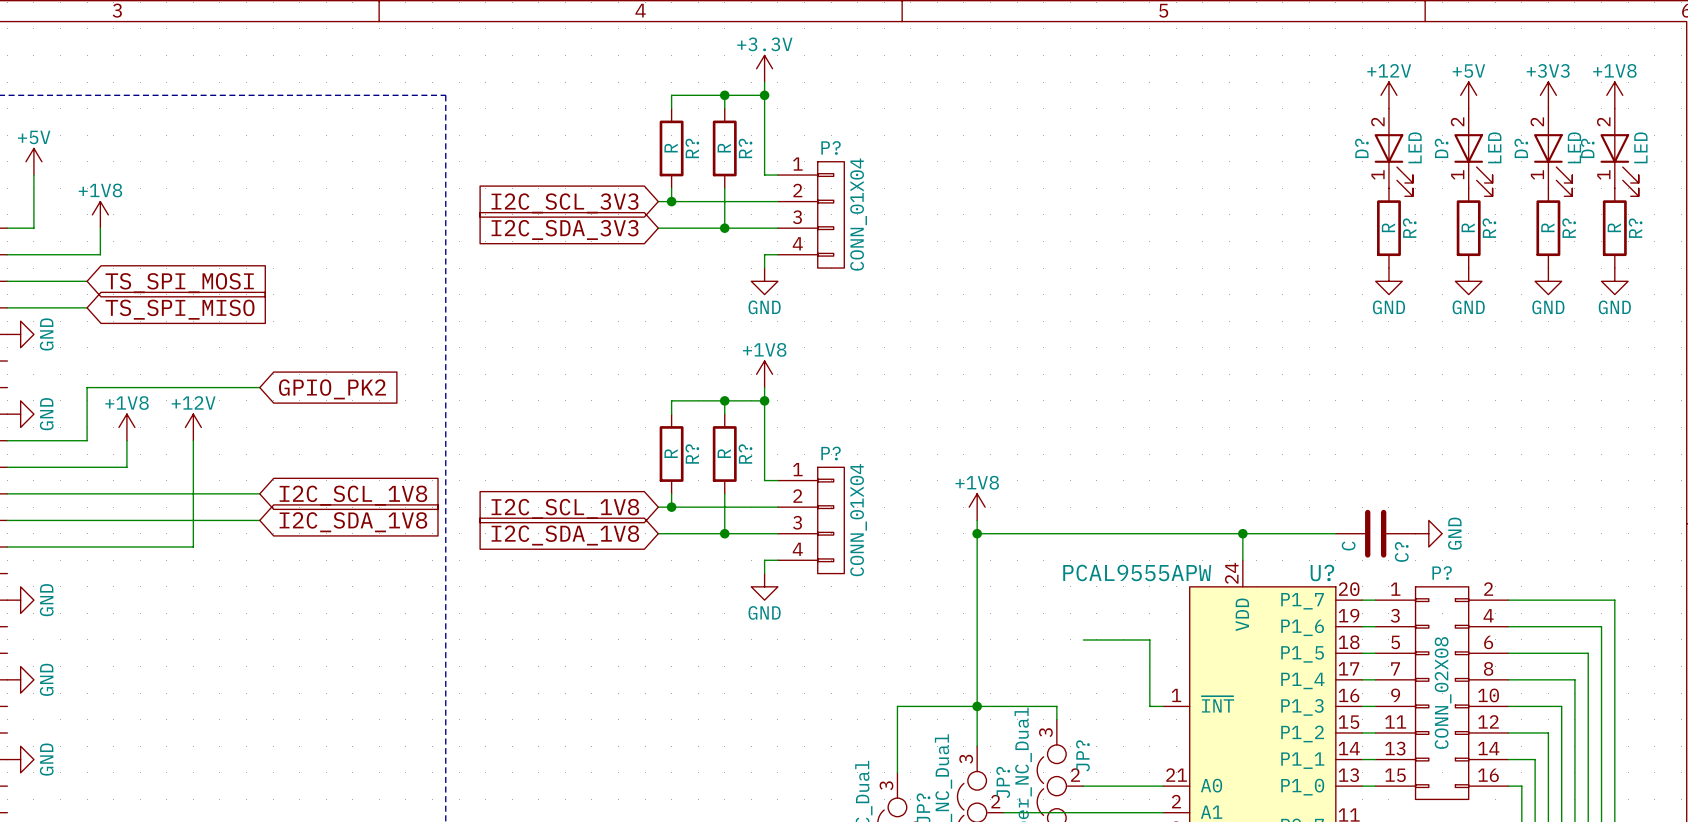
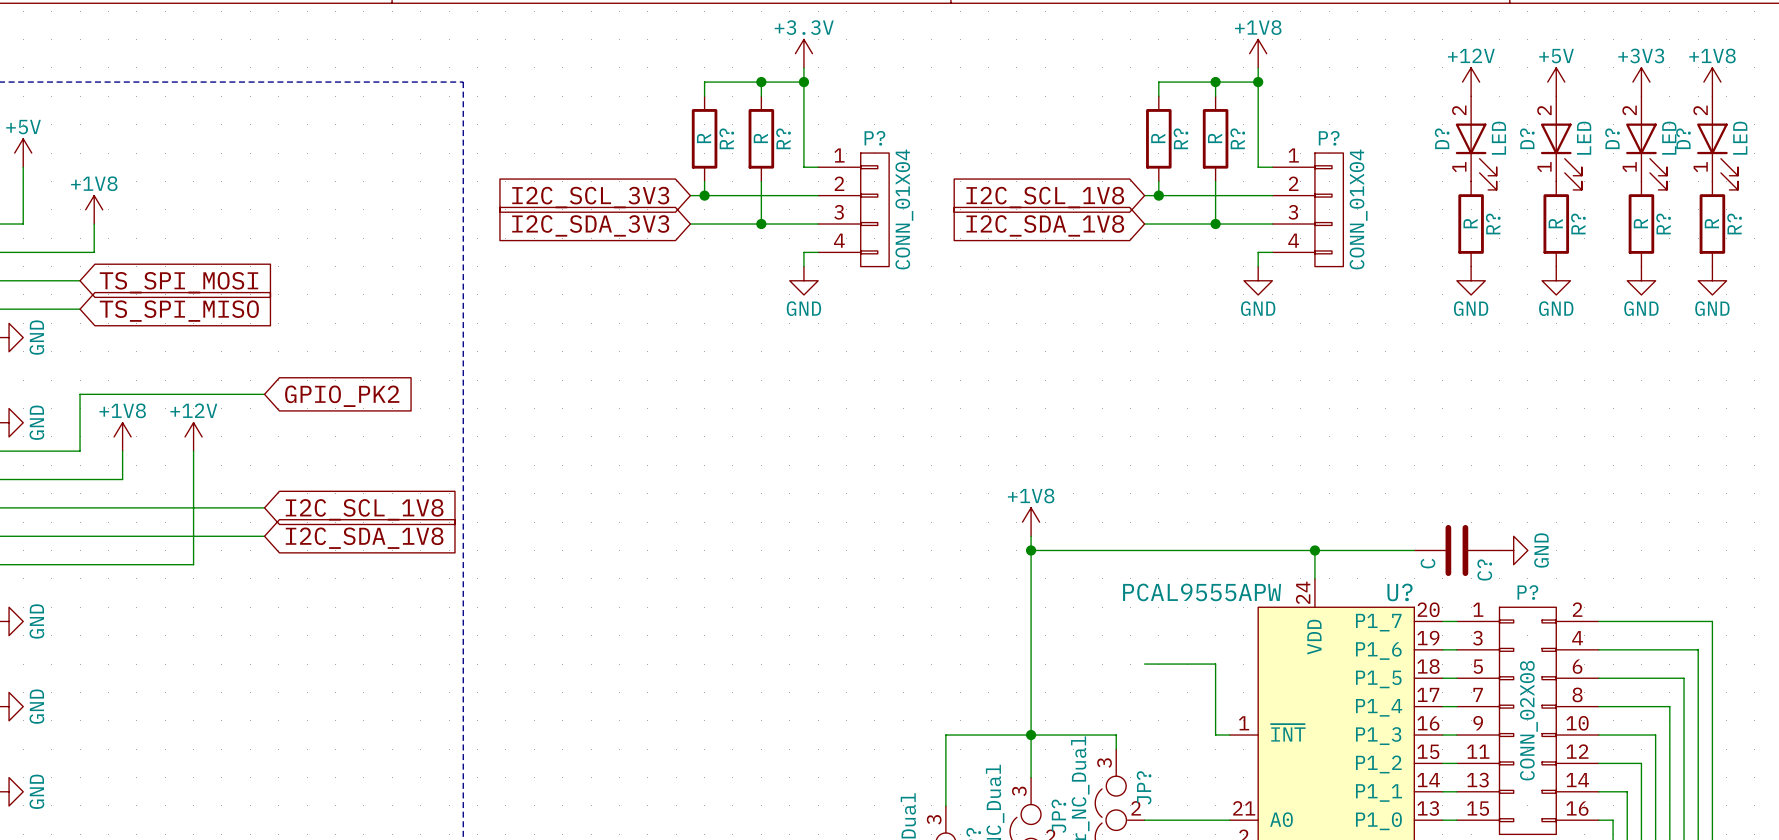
power symbol: none -> +1V8 (1258, 53)
wire: none -> (1258, 67) (1258, 167) (1272, 167)
wire: none -> (1215, 82) (1215, 96)
junction: none -> (1215, 82)
wire: none -> (1258, 82) (1158, 82) (1158, 96)
junction: none -> (1258, 82)
R?: none -> R (1158, 138)
R?: none -> R (1215, 138)
wire: none -> (1158, 181) (1158, 195)
wire: none -> (1215, 181) (1215, 224)
wire: none -> (1144, 195) (1272, 195)
junction: none -> (1158, 195)
global label: none -> I2C_SCL_1V8 (1045, 197)
P?: none -> CONN_01X04 (1307, 209)
wire: none -> (1144, 224) (1272, 224)
junction: none -> (1215, 224)
global label: none -> I2C_SDA_1V8 (1045, 225)
wire: none -> (1272, 252) (1258, 252) (1258, 266)
power symbol: none -> GND (1258, 280)
power symbol: +1V8 (764, 374) -> none
wire: (764, 387) (764, 480) (777, 480) -> none
wire: (724, 400) (724, 414) -> none
junction: (724, 400) -> none
wire: (764, 400) (671, 400) (671, 414) -> none
junction: (764, 400) -> none
R?: R (671, 454) -> none
R?: R (724, 454) -> none
wire: (671, 493) (671, 507) -> none
wire: (724, 493) (724, 533) -> none
wire: (658, 507) (777, 507) -> none
junction: (671, 507) -> none
global label: I2C_SCL_1V8 (565, 508) -> none
P?: CONN_01X04 (811, 520) -> none
wire: (658, 533) (777, 533) -> none
junction: (724, 533) -> none
global label: I2C_SDA_1V8 (565, 535) -> none
wire: (777, 560) (764, 560) (764, 573) -> none
power symbol: GND (764, 586) -> none

